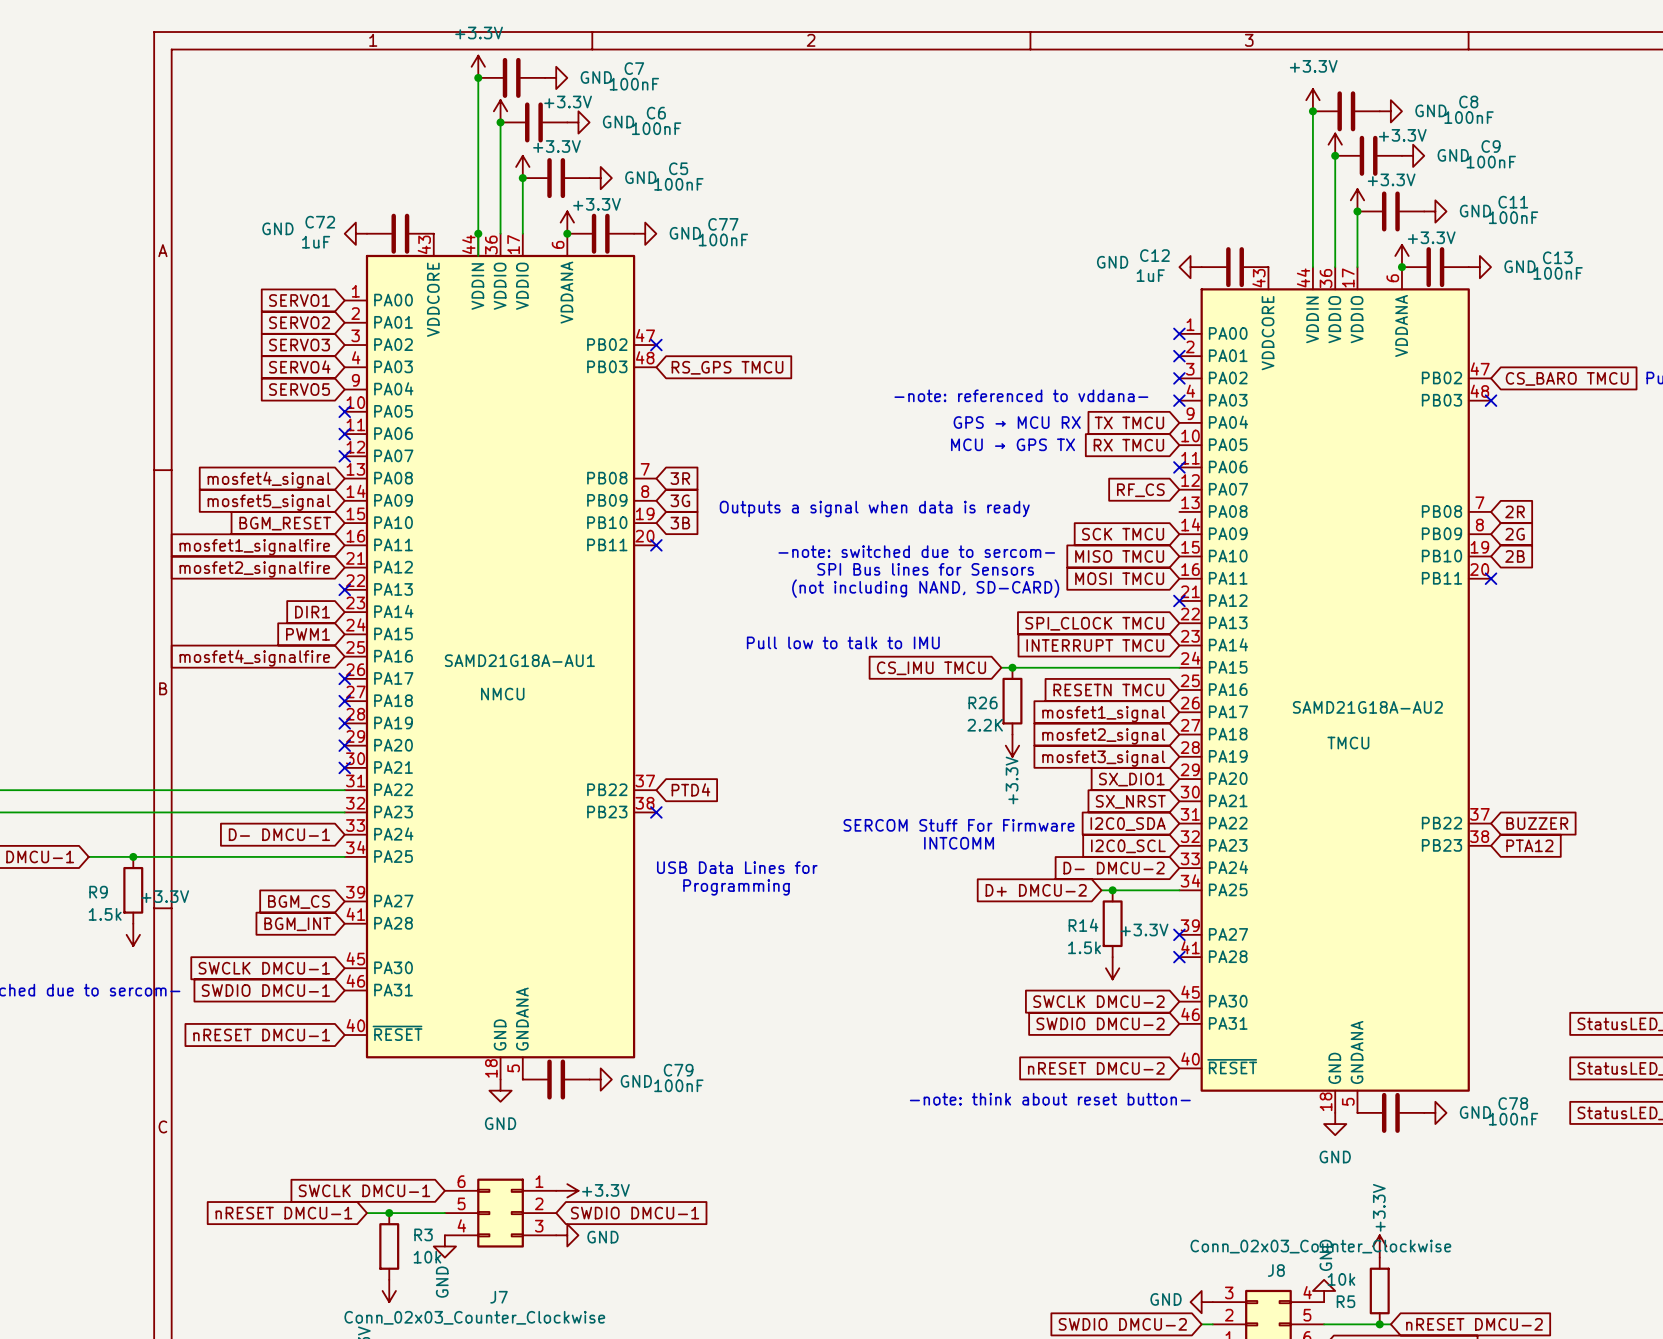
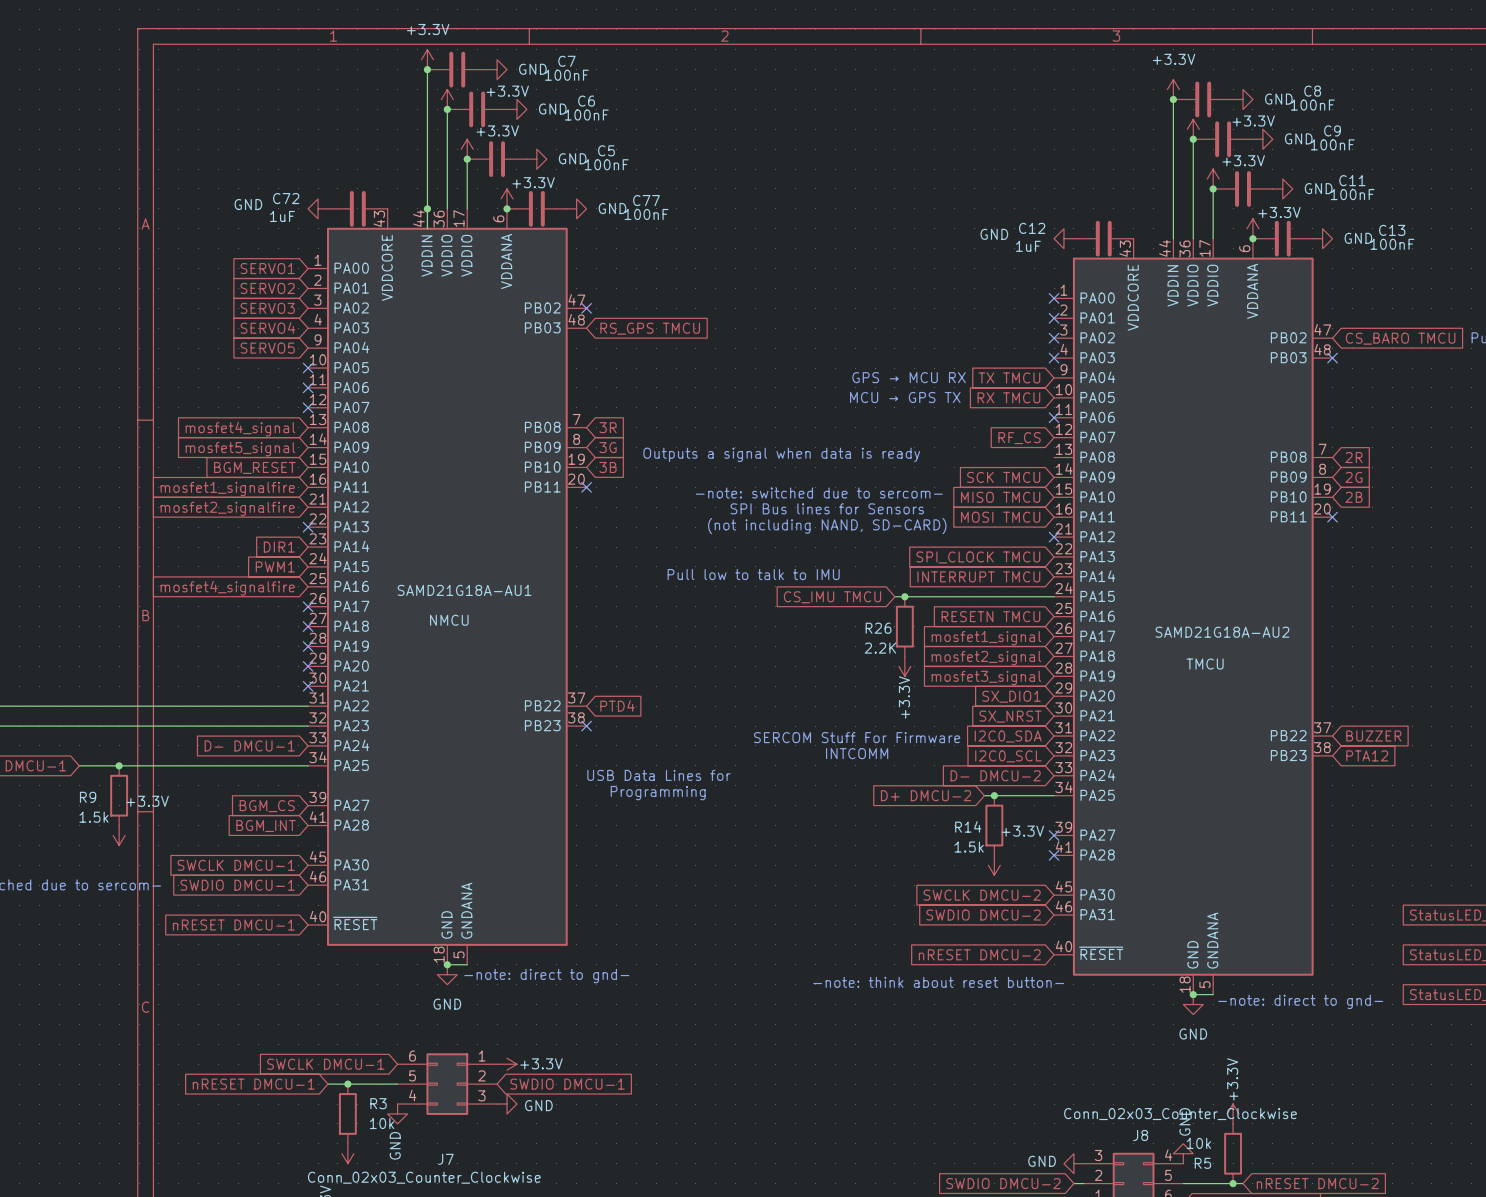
text: -note: referenced to vddana- (1021, 395) -> none
wire: none -> (447, 964) (467, 964)
junction: none -> (447, 964)
C79: 100nF (556, 1079) -> none
power symbol: GND (600, 1079) -> none
text: none -> -note: direct to gnd- (546, 976)
wire: none -> (1193, 994) (1213, 994)
junction: none -> (1193, 994)
C78: 100nF (1390, 1112) -> none
power symbol: GND (1435, 1112) -> none
text: none -> -note: direct to gnd- (1300, 1001)

